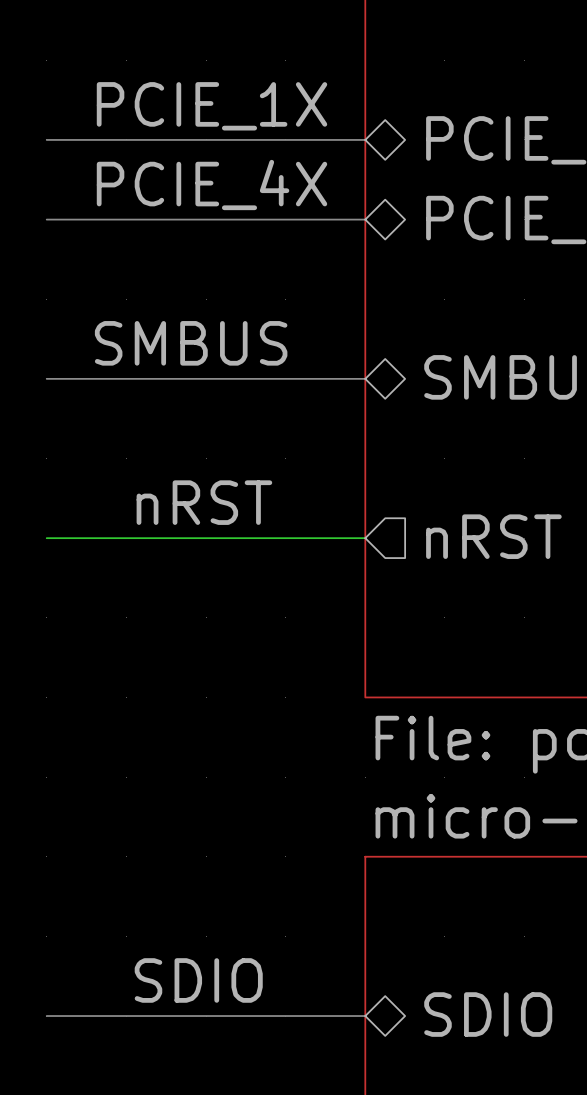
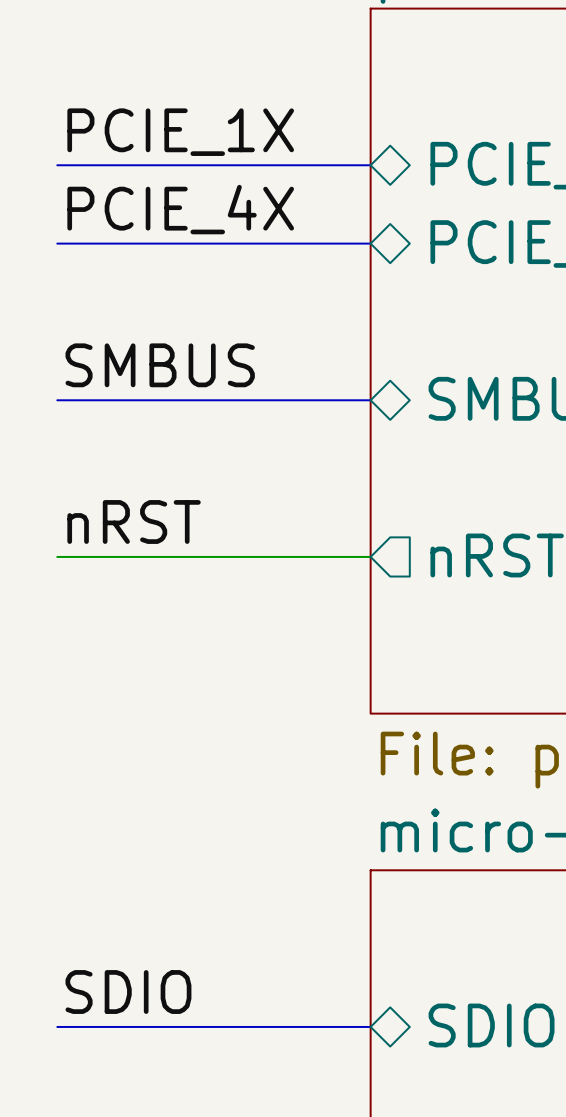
label position: PCIE_1X (212, 106) -> PCIE_1X (180, 132)
label position: PCIE_4X (212, 185) -> PCIE_4X (180, 209)
label position: SMBUS (191, 343) -> SMBUS (160, 365)
label position: nRST (204, 502) -> nRST (134, 521)
label position: SDIO (198, 980) -> SDIO (128, 992)

